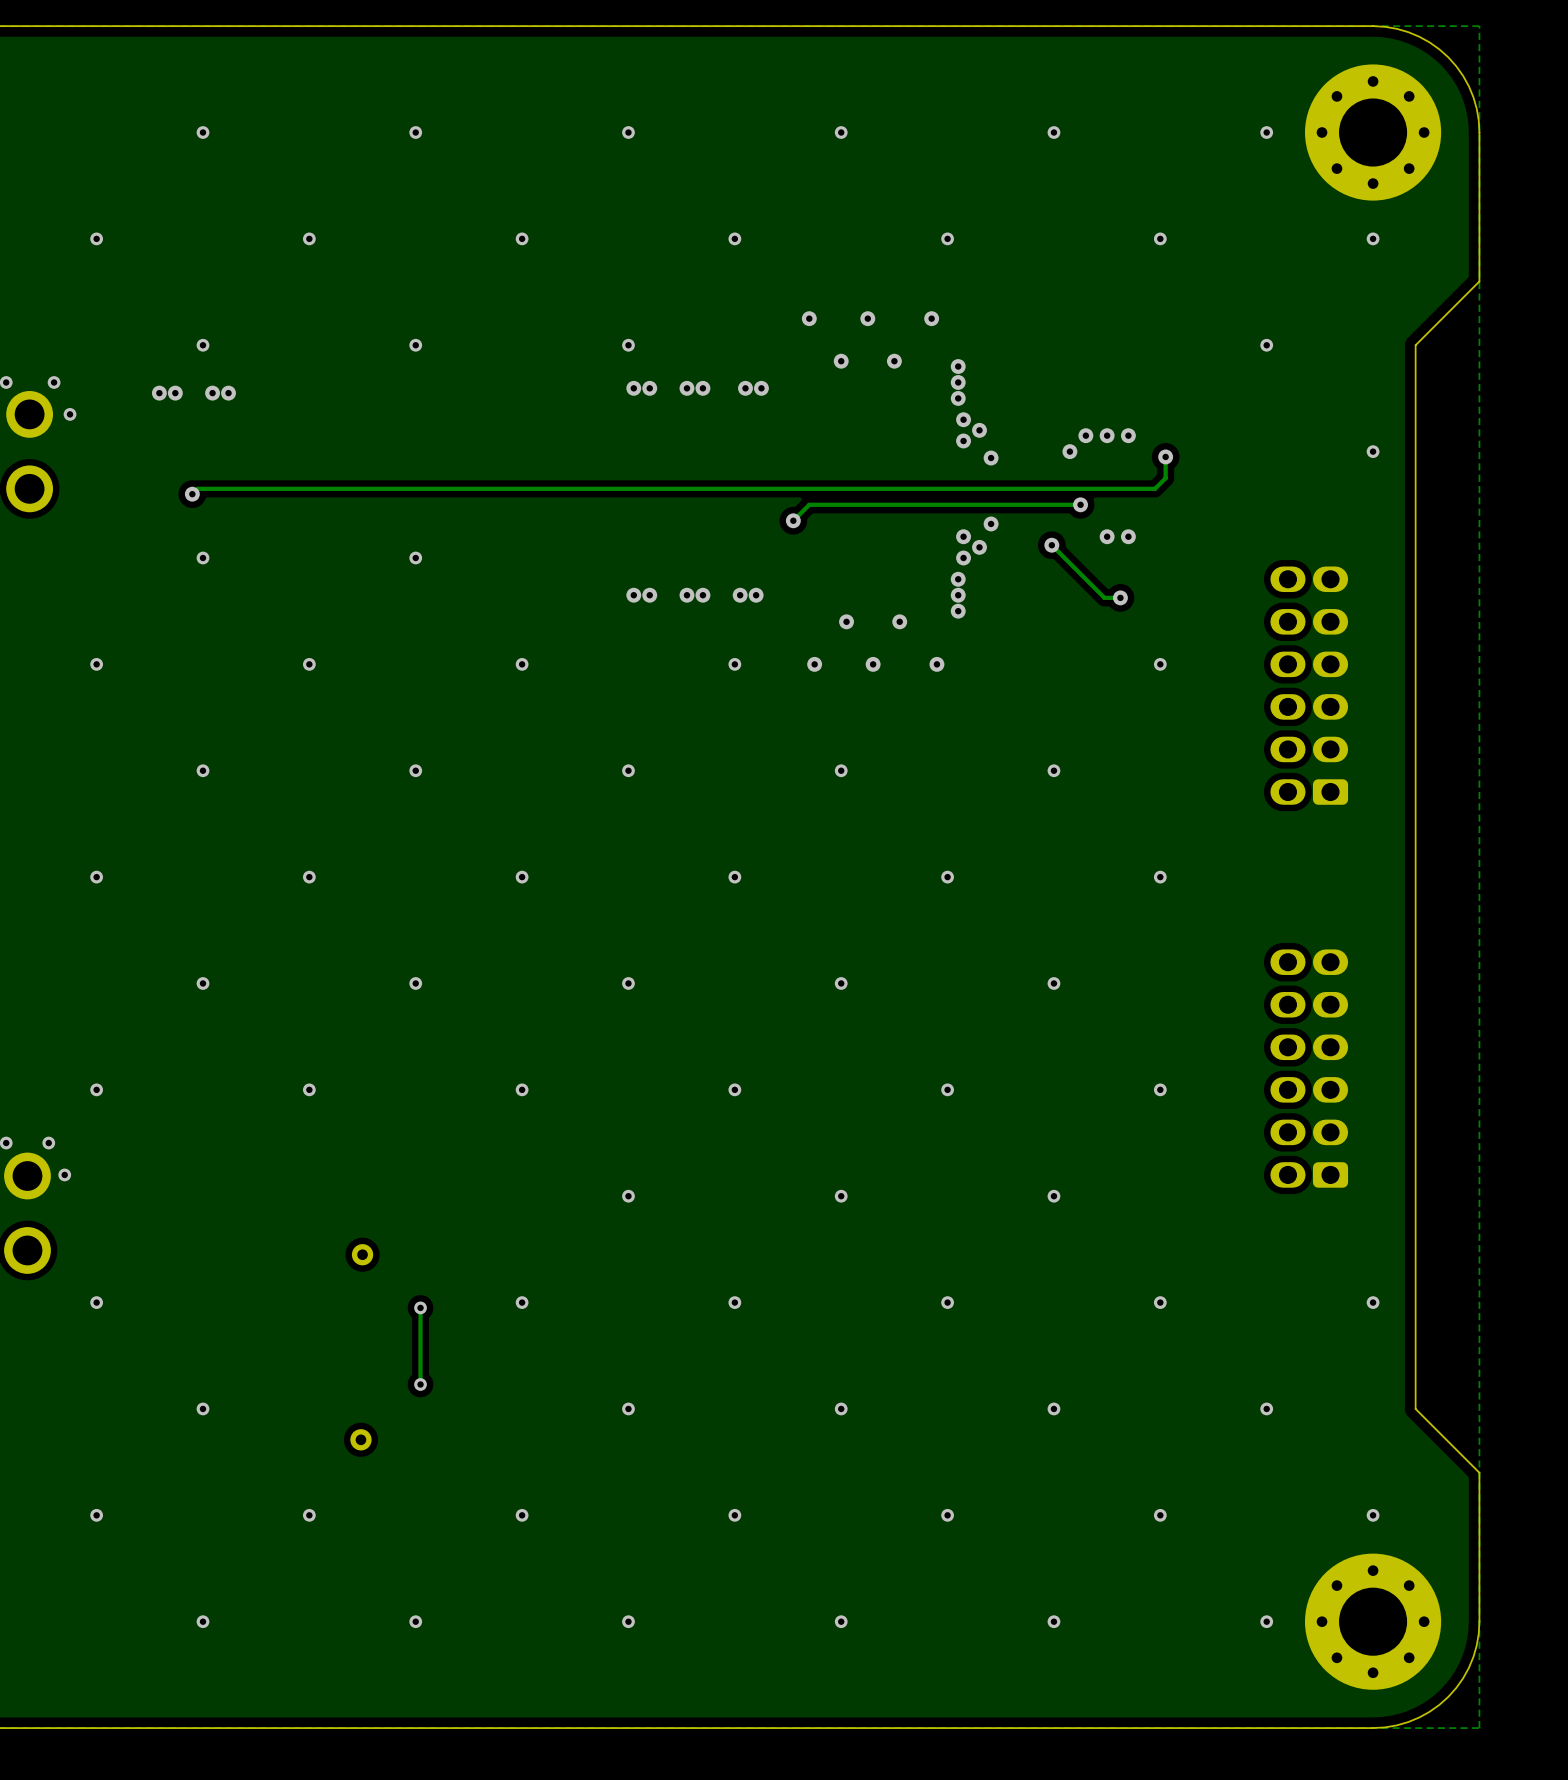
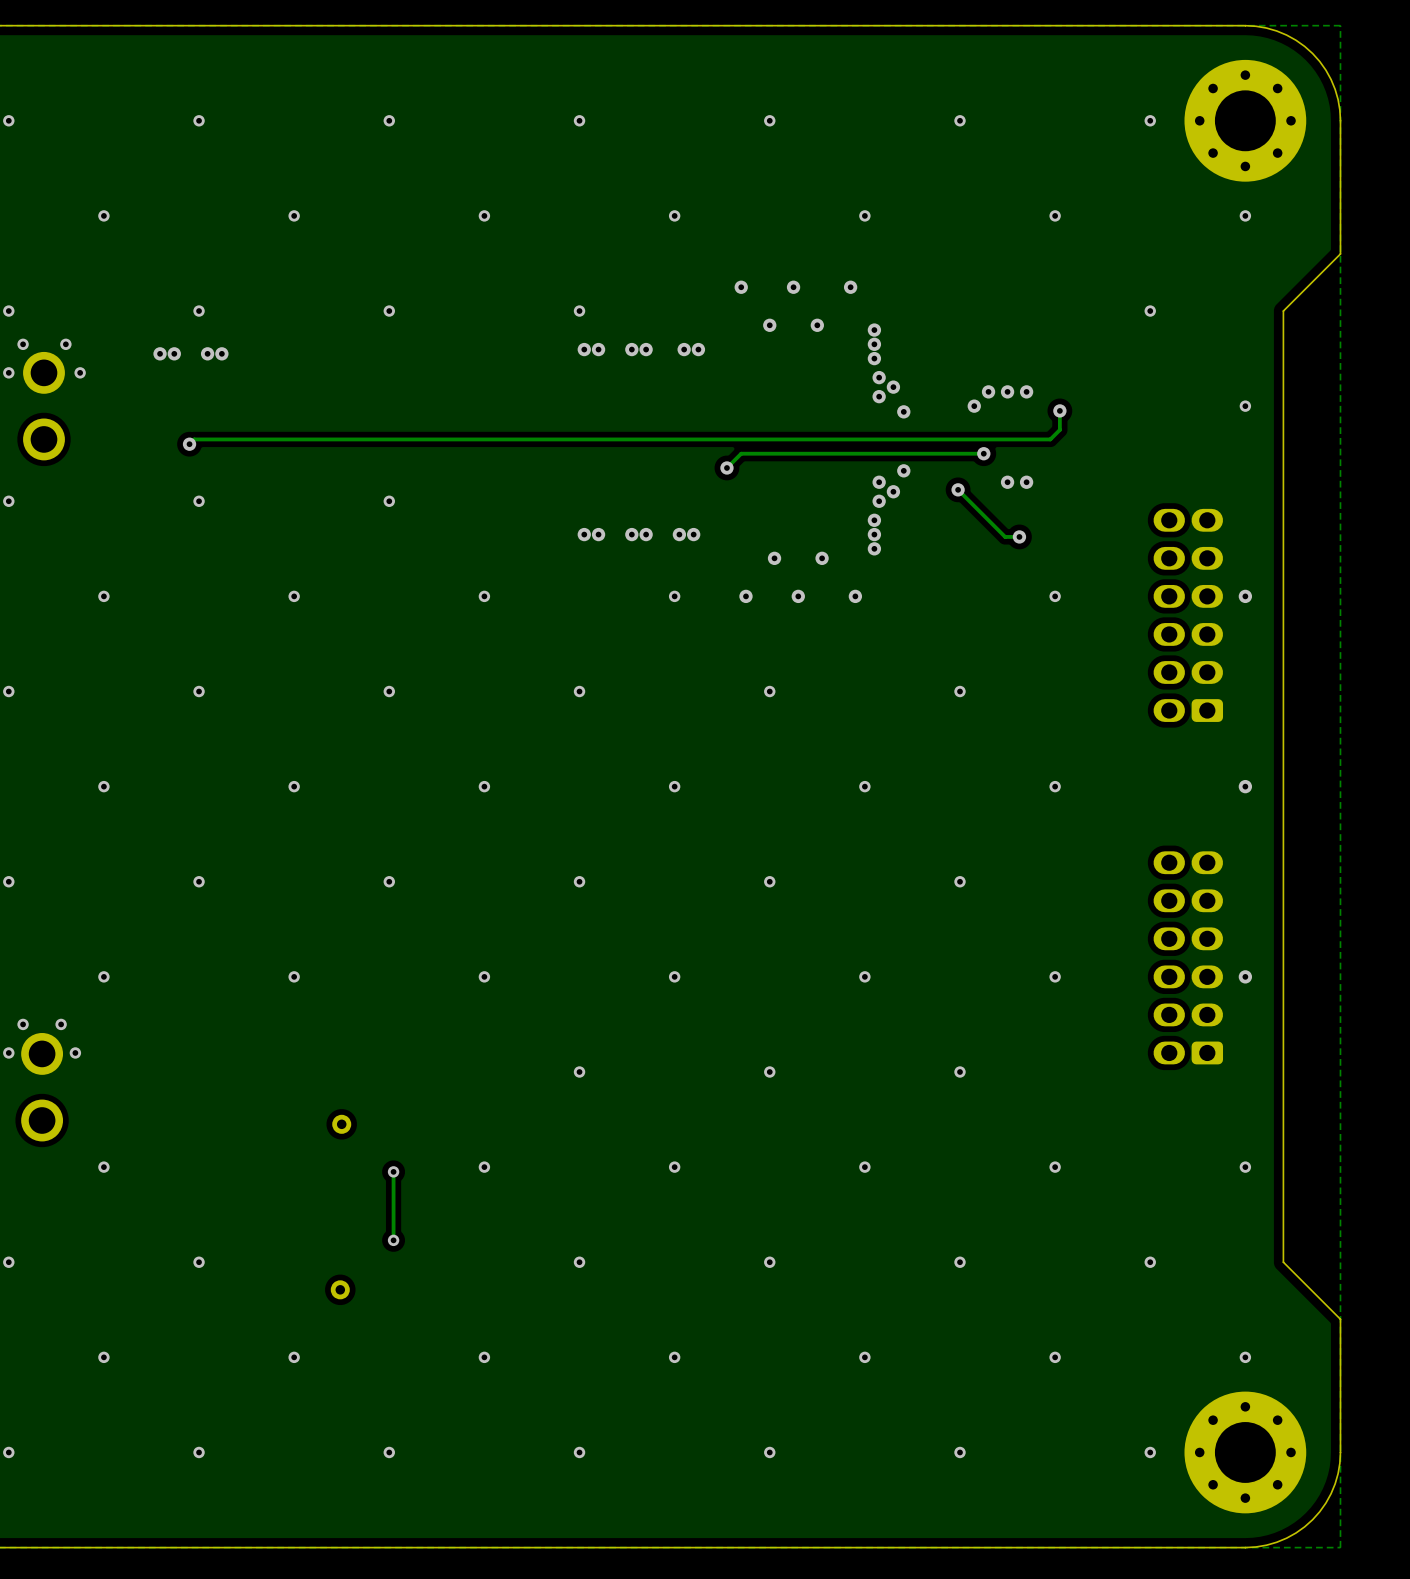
via: none -> (1245, 596)
via: none -> (1245, 786)
via: none -> (1245, 976)

